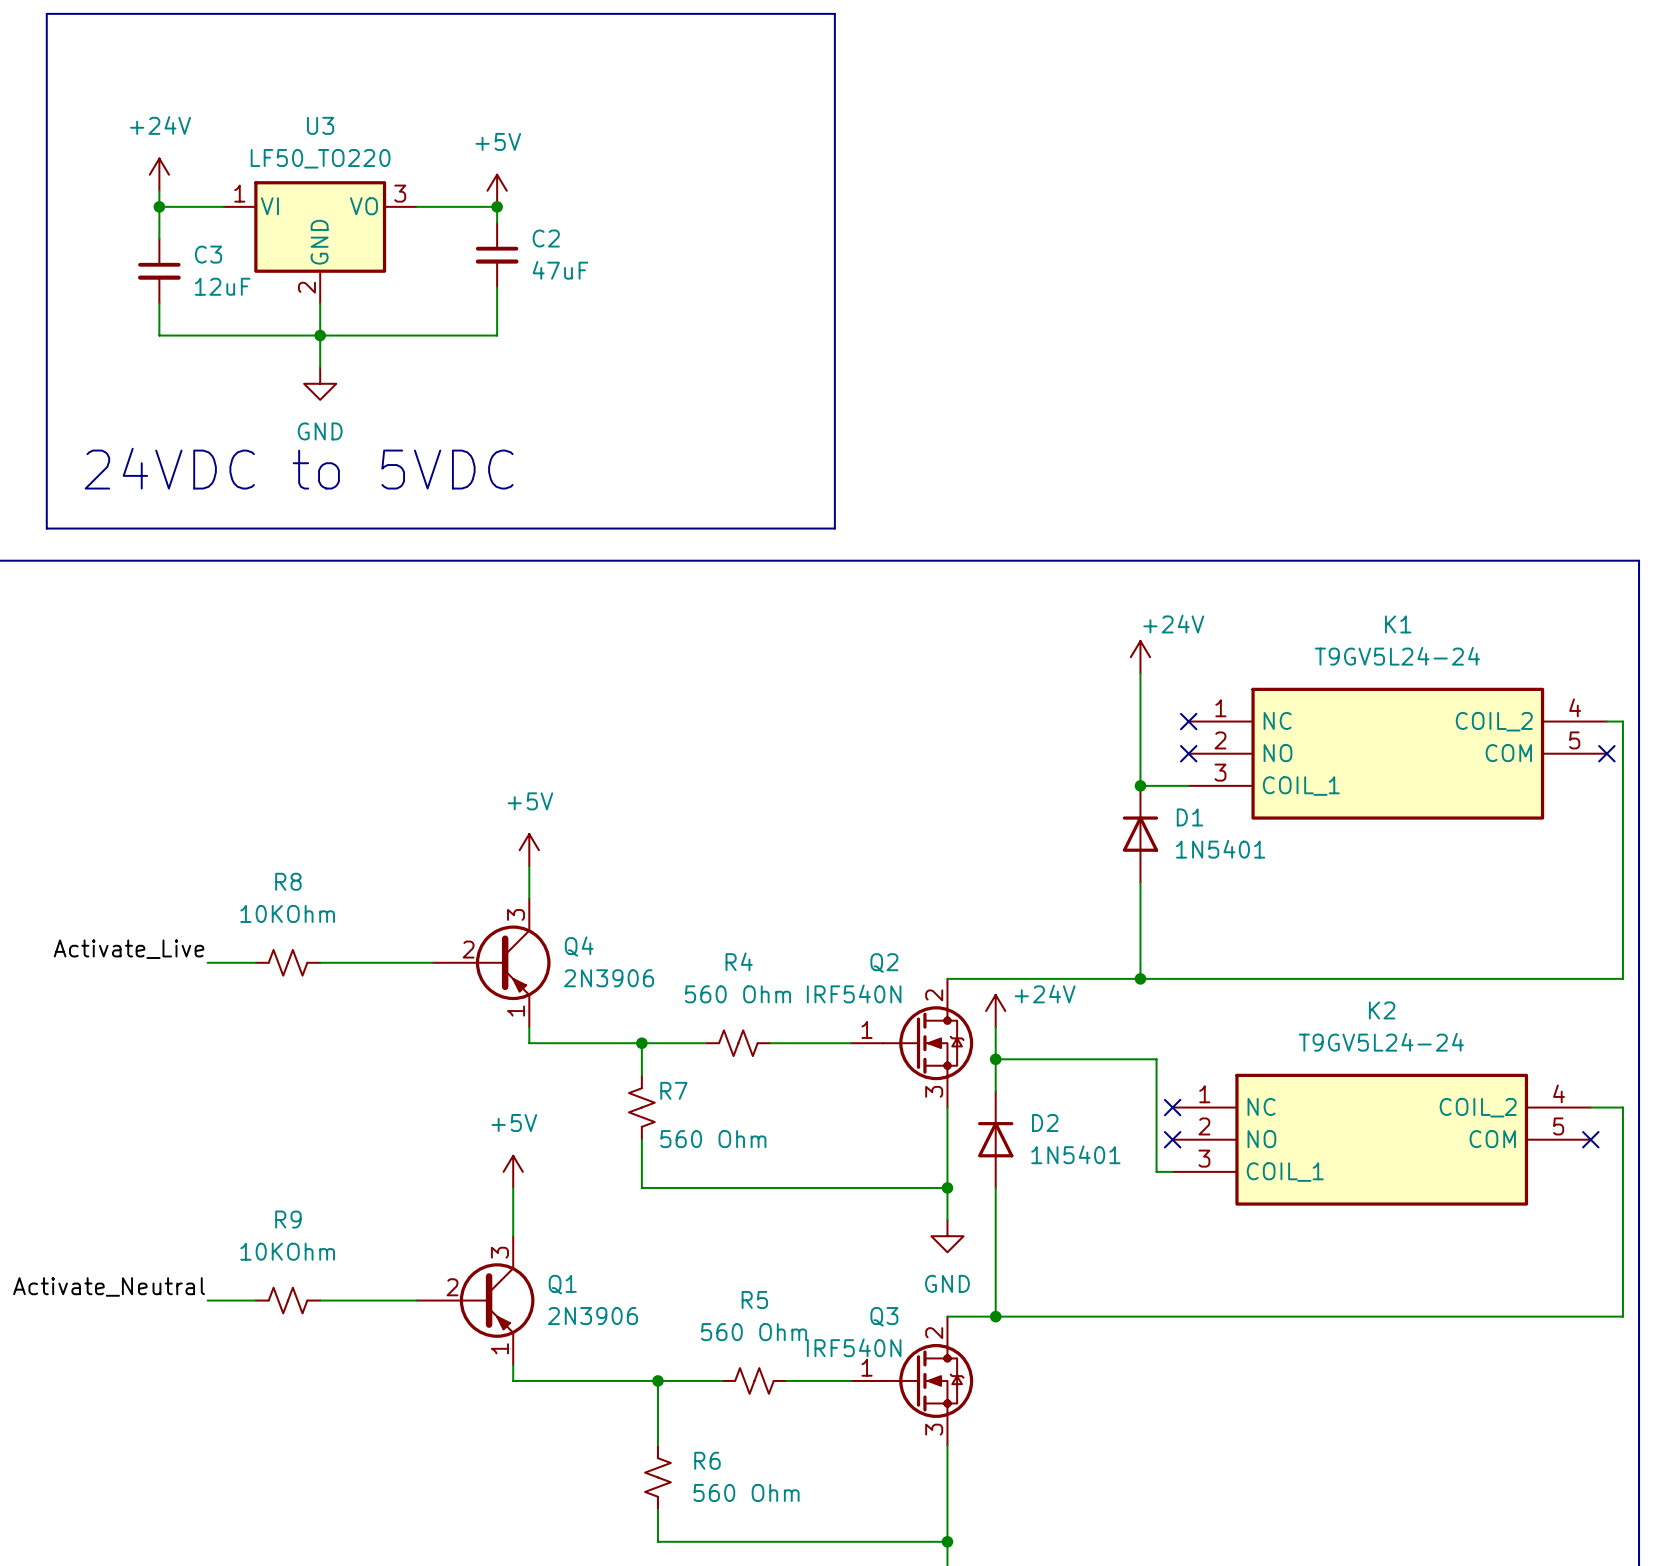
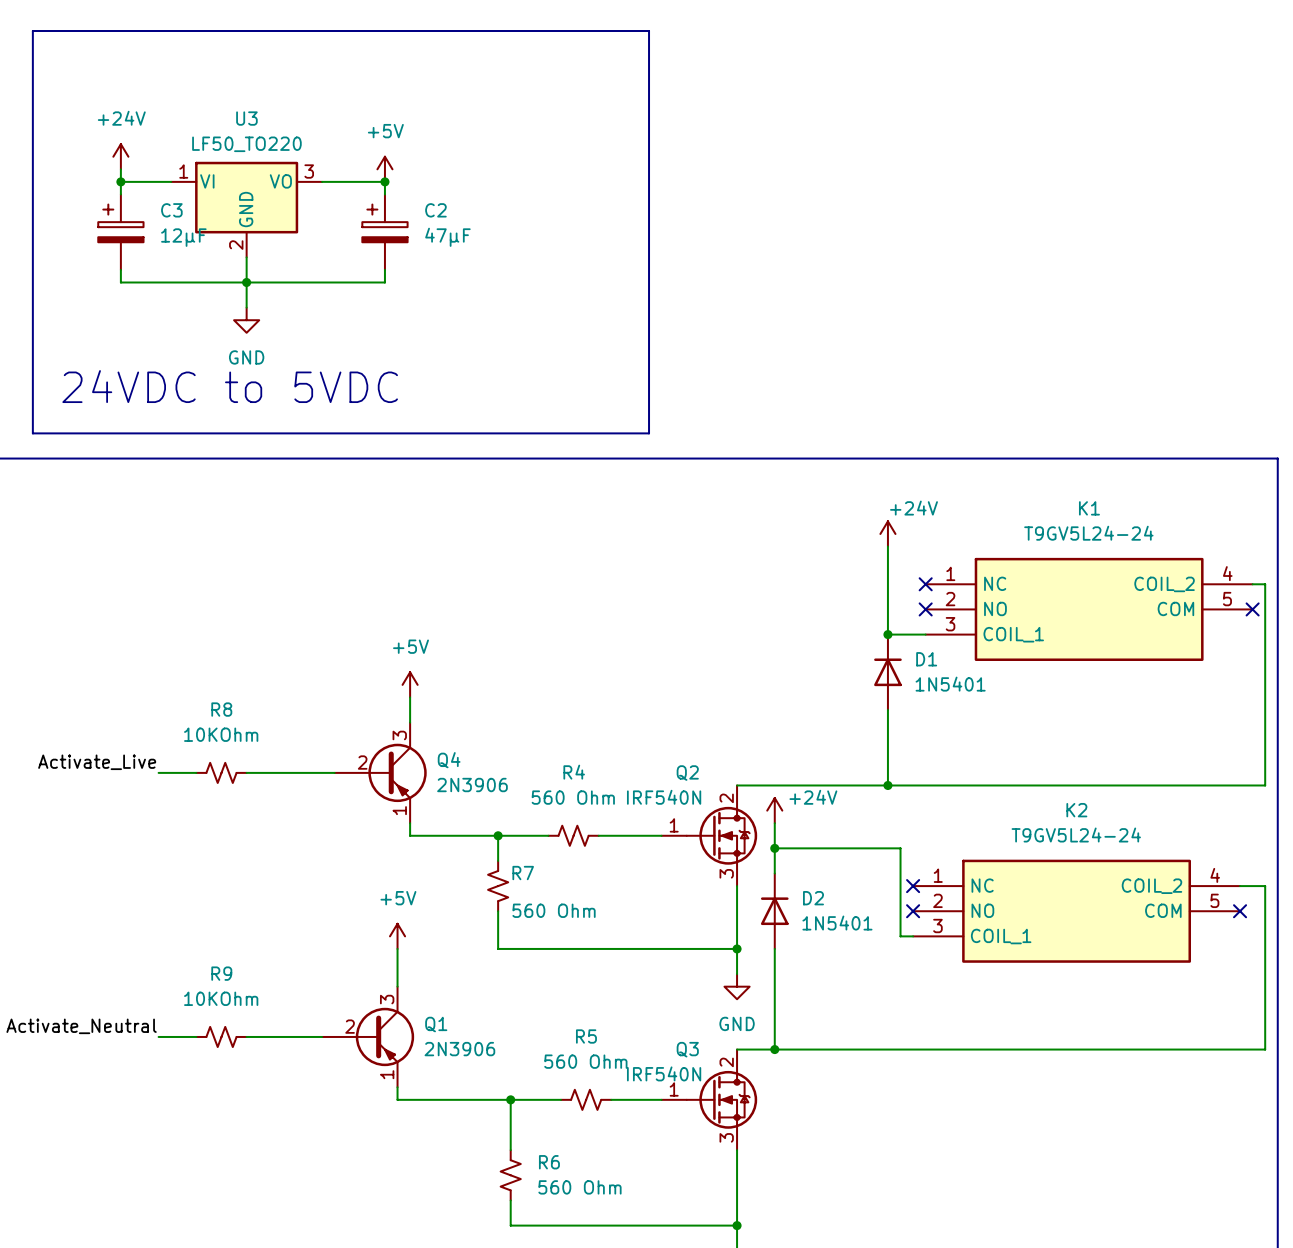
C2 symbol: [475, 222, 519, 288] -> [362, 194, 408, 270]
C3 symbol: [137, 239, 181, 304] -> [98, 194, 144, 270]
C2 value: 47uF (560, 270) -> 47µF (447, 237)
C3 value: 12uF (222, 286) -> 12µF (183, 237)

